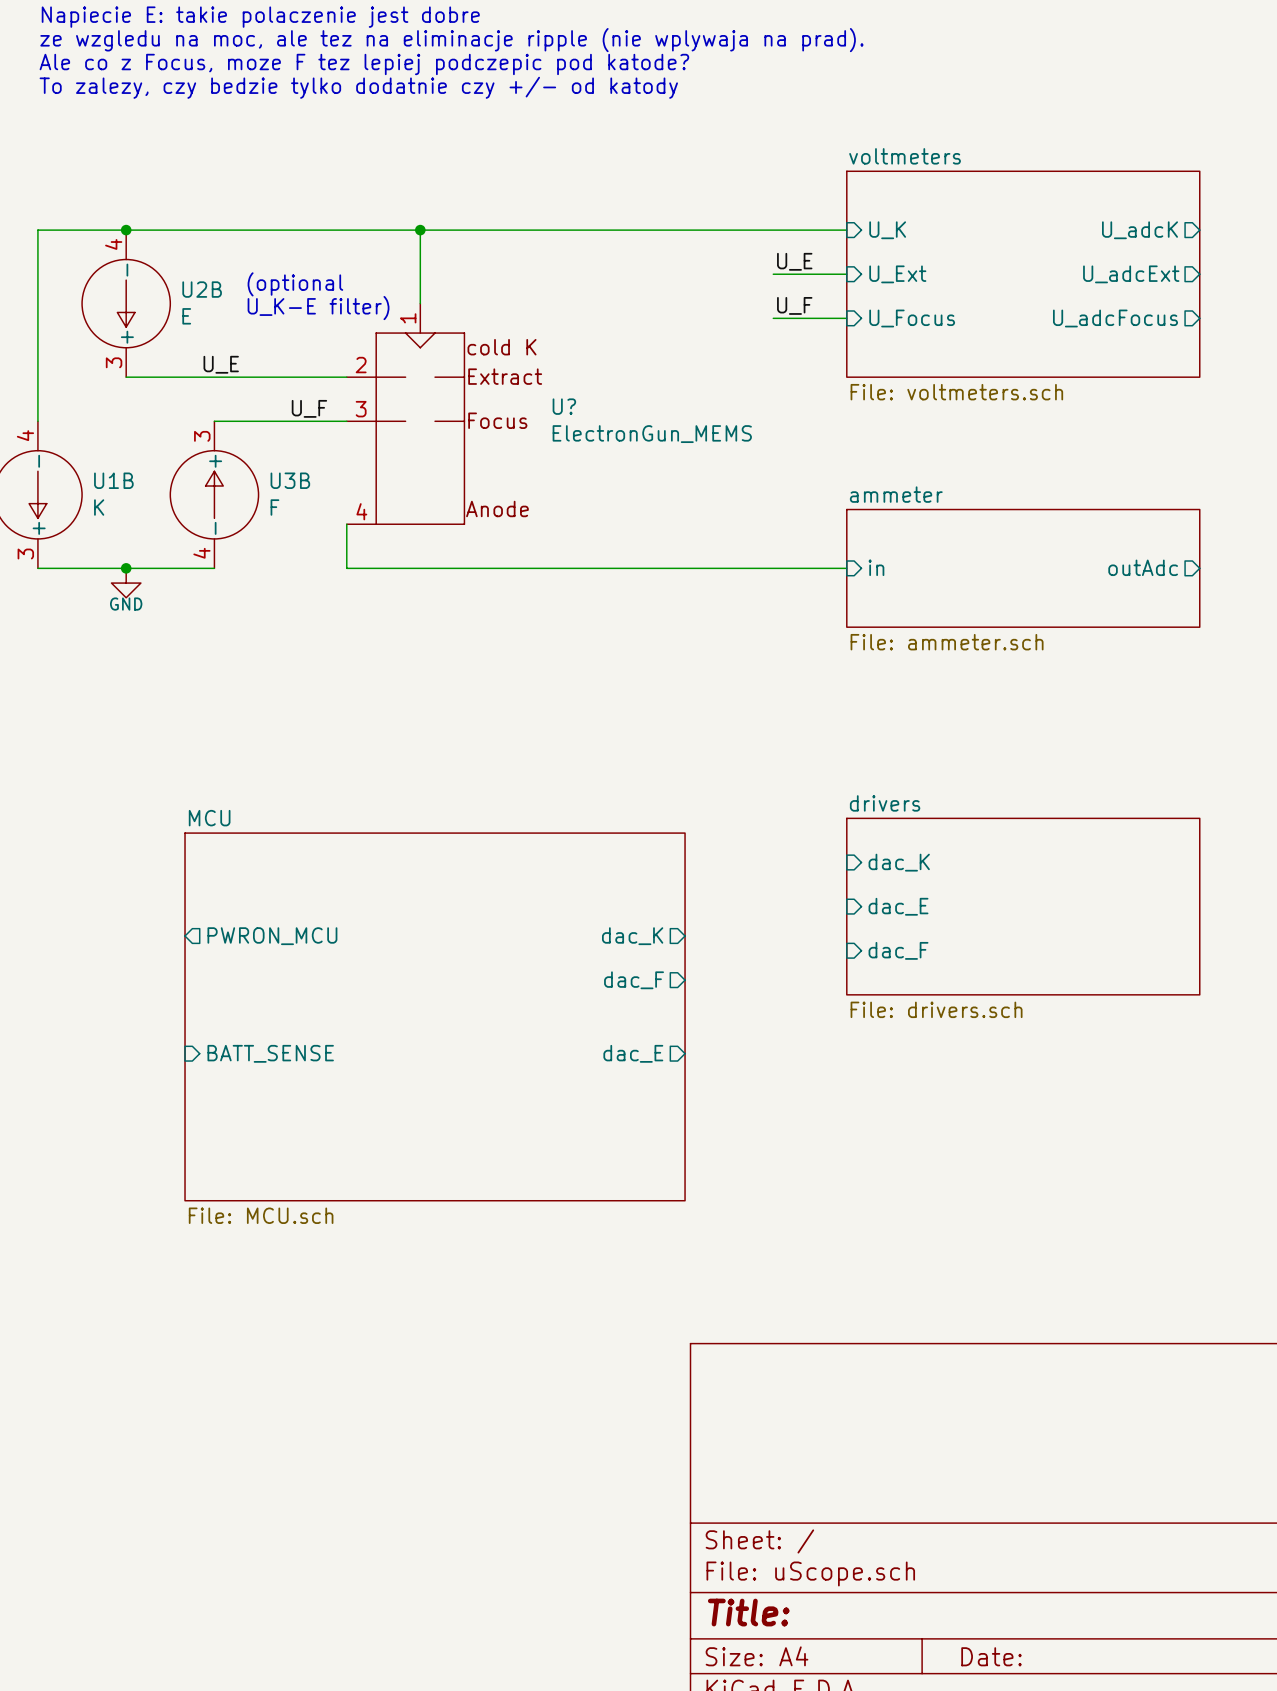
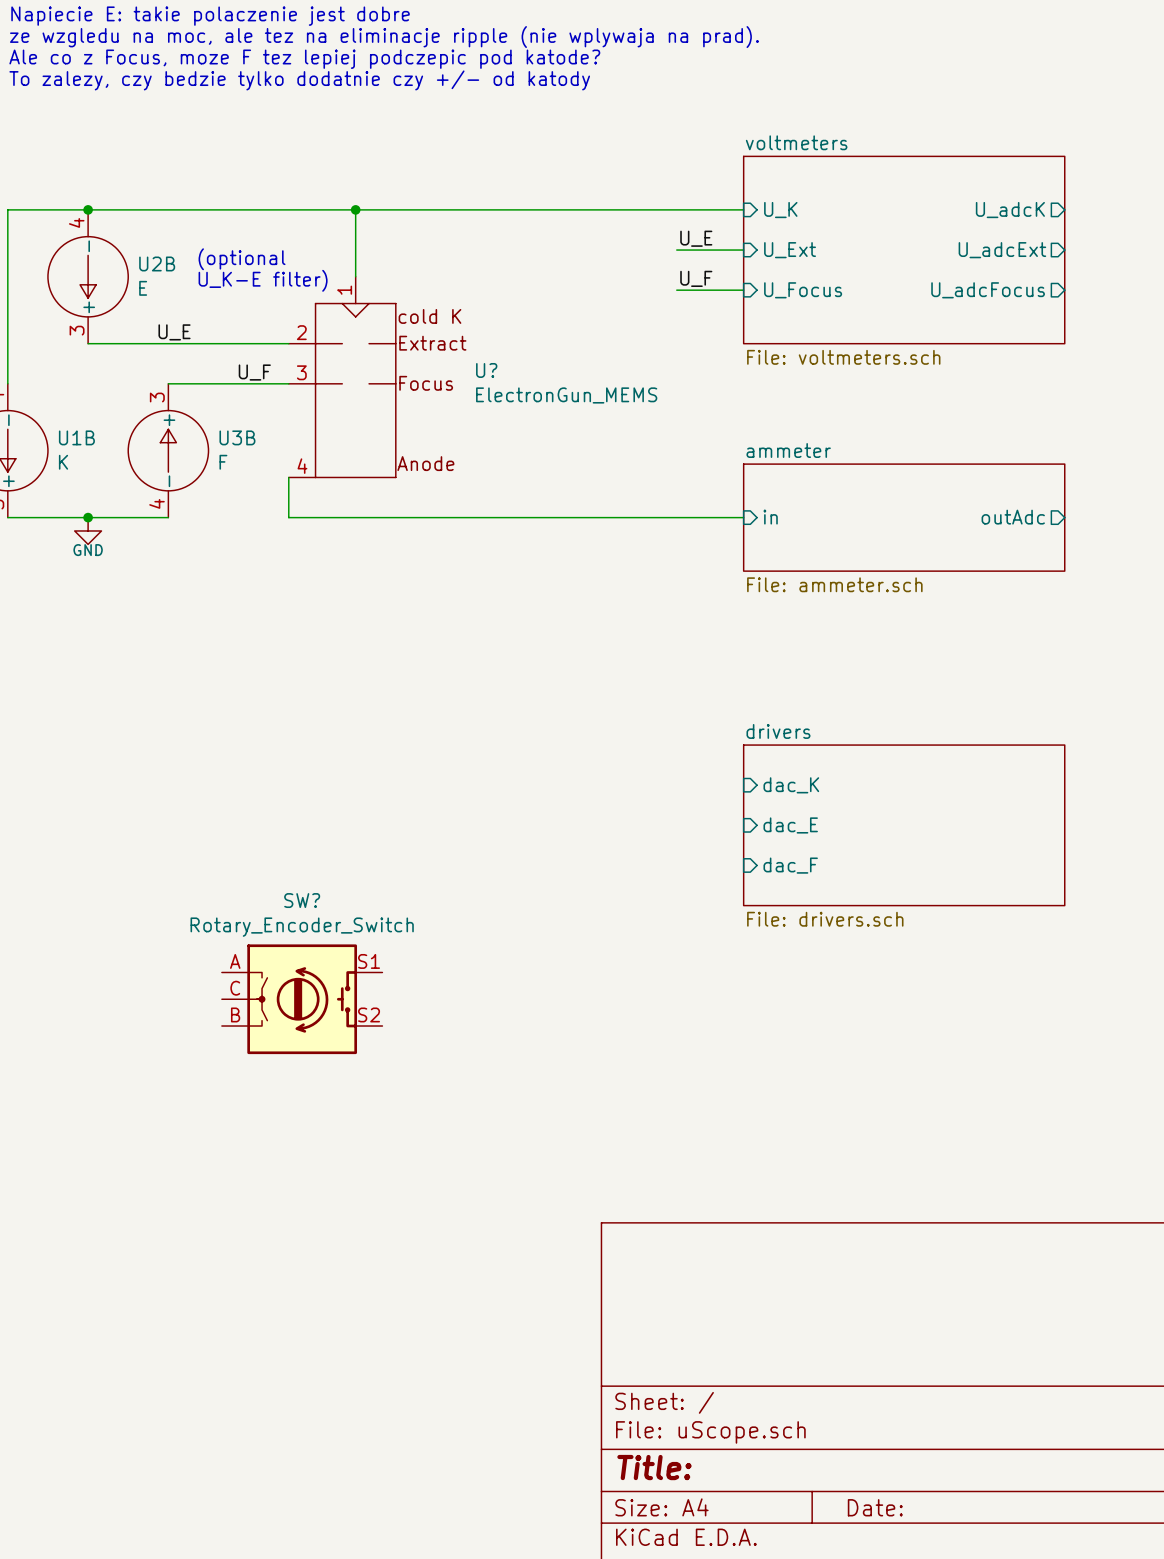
sheet pin: PWRON_MCU (272, 936) -> none
sheet pin: dac_K (632, 936) -> none
sheet pin: dac_F (634, 980) -> none
sheet MCU: File: MCU.sch (435, 1016) -> none
sheet pin: BATT_SENSE (270, 1053) -> none
sheet pin: dac_E (633, 1053) -> none
SW?: none -> Rotary_Encoder_Switch (302, 999)

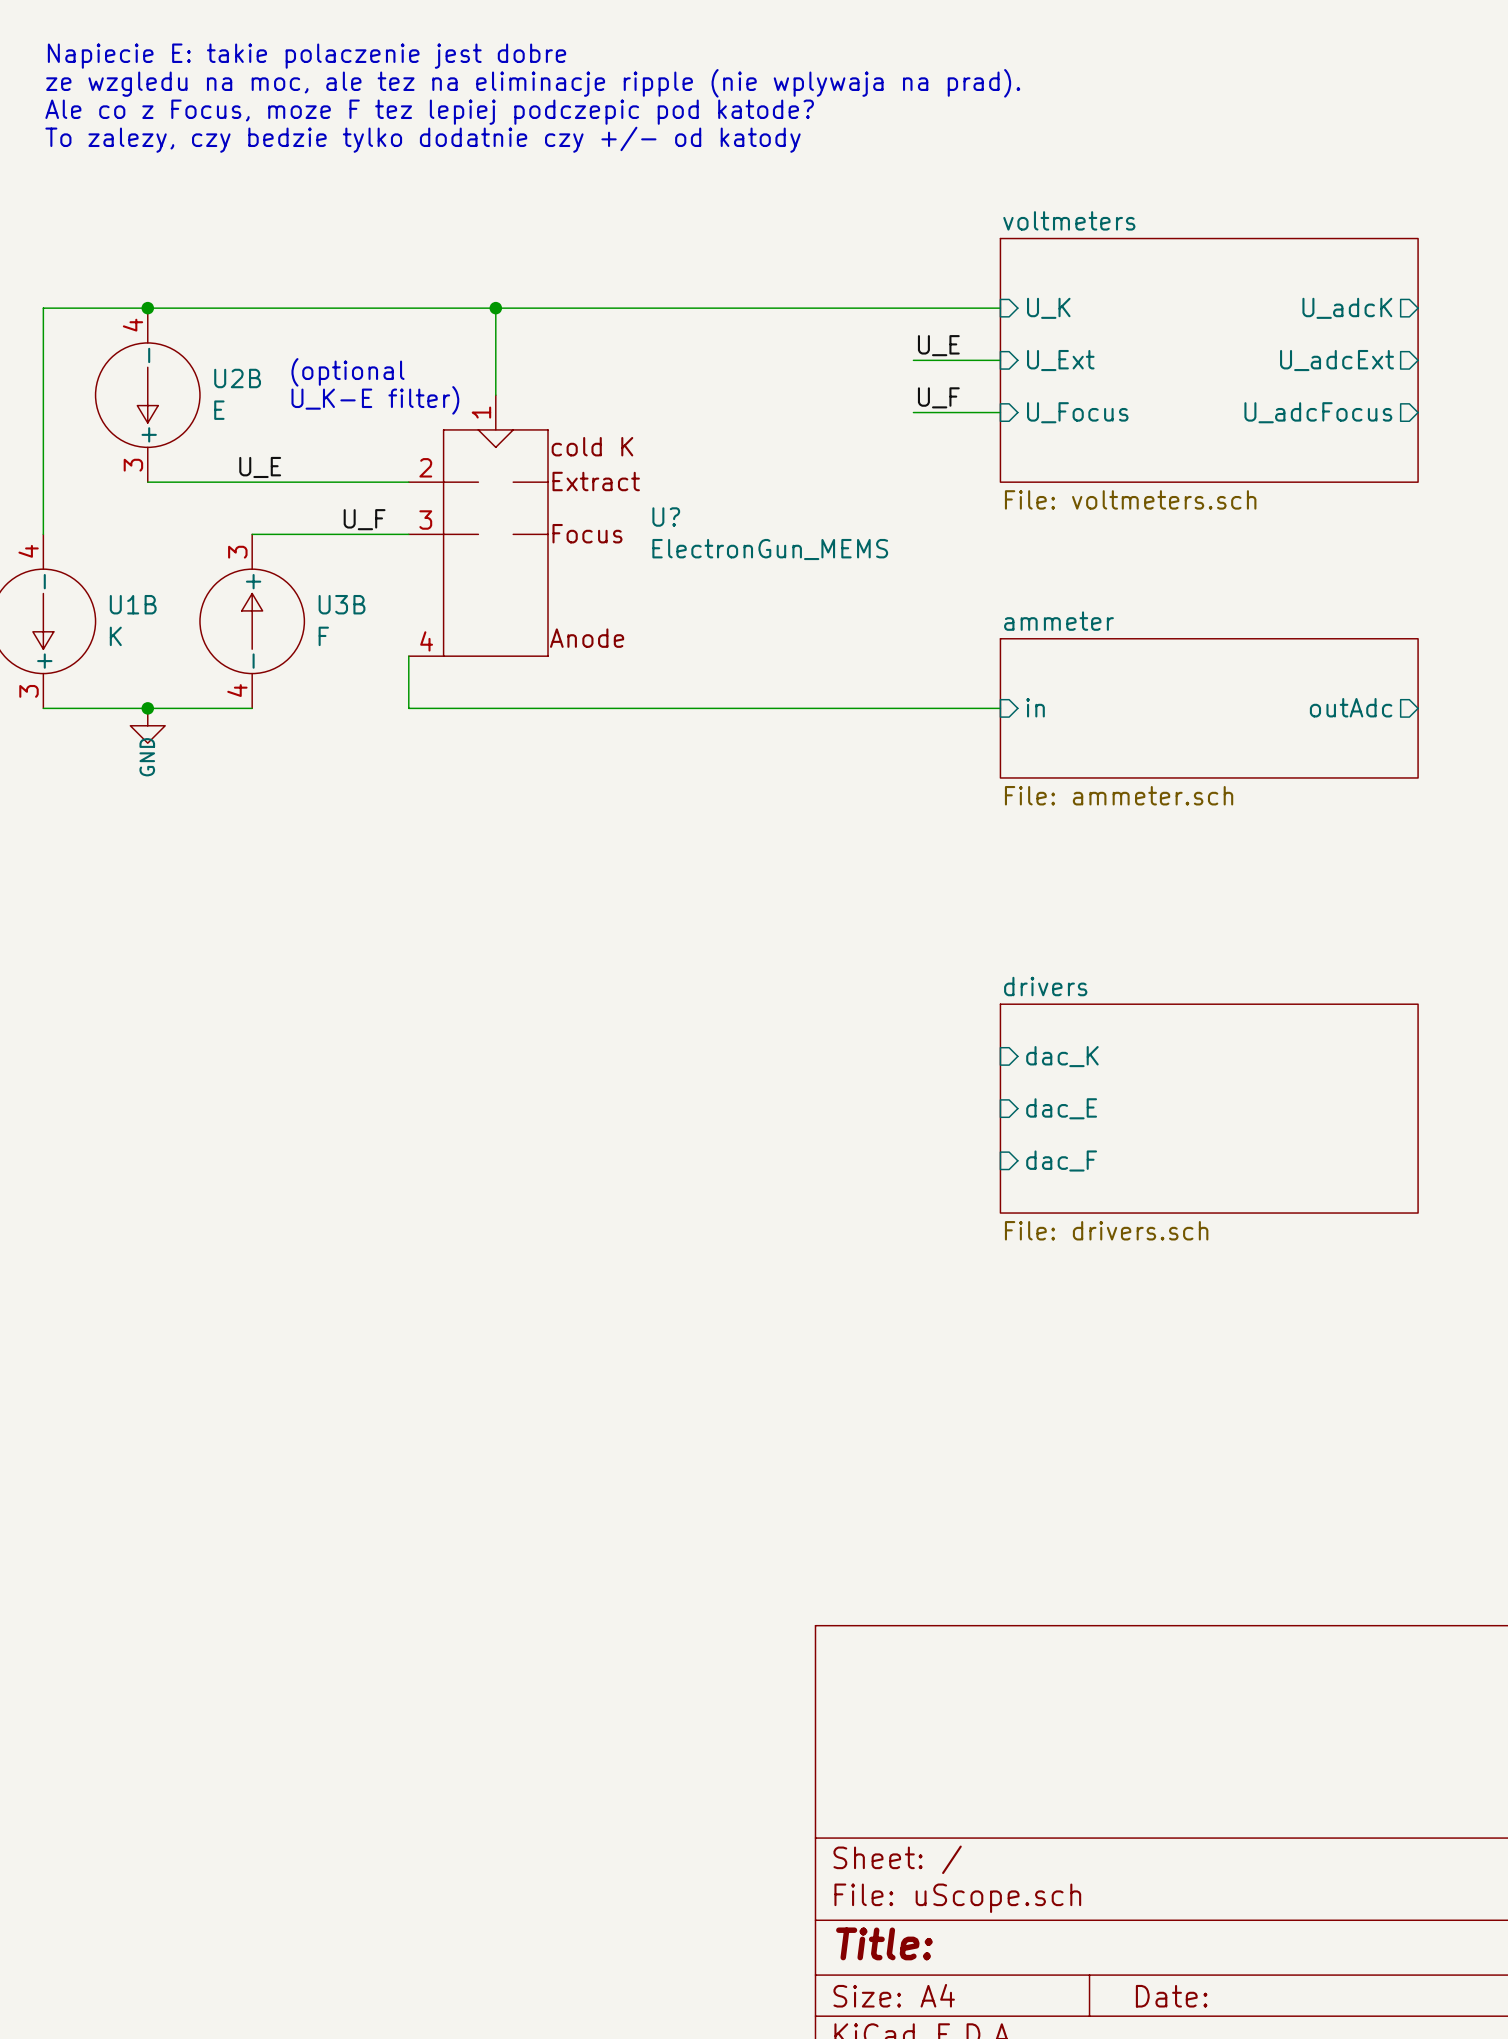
power symbol text rotation: 0° (88, 550) -> 90° counterclockwise (147, 757)
SW?: Rotary_Encoder_Switch (302, 999) -> none

